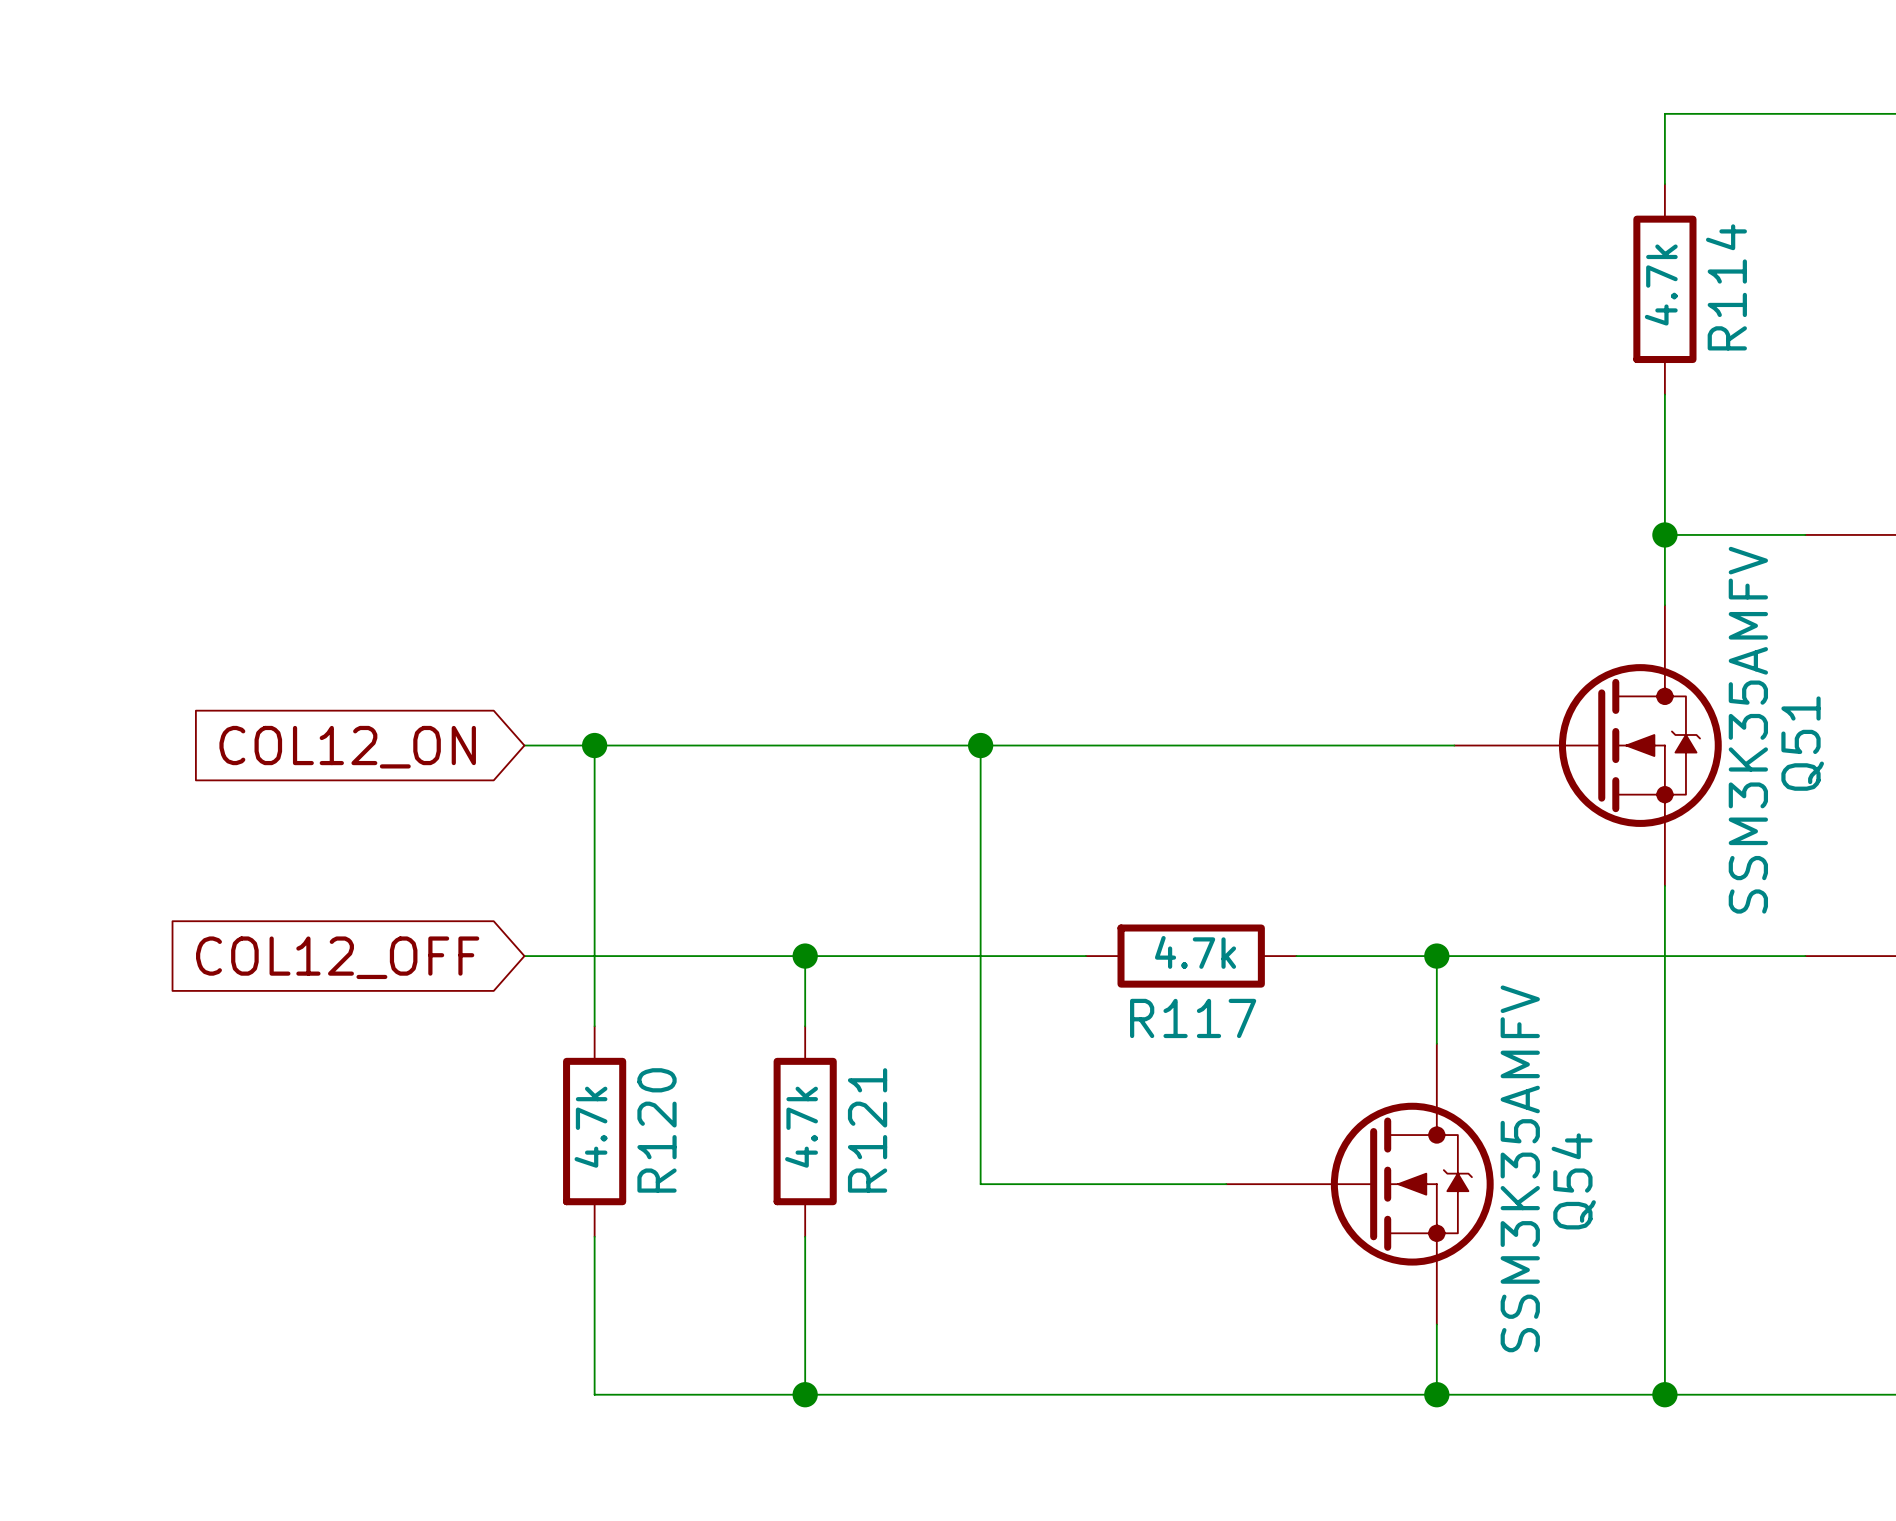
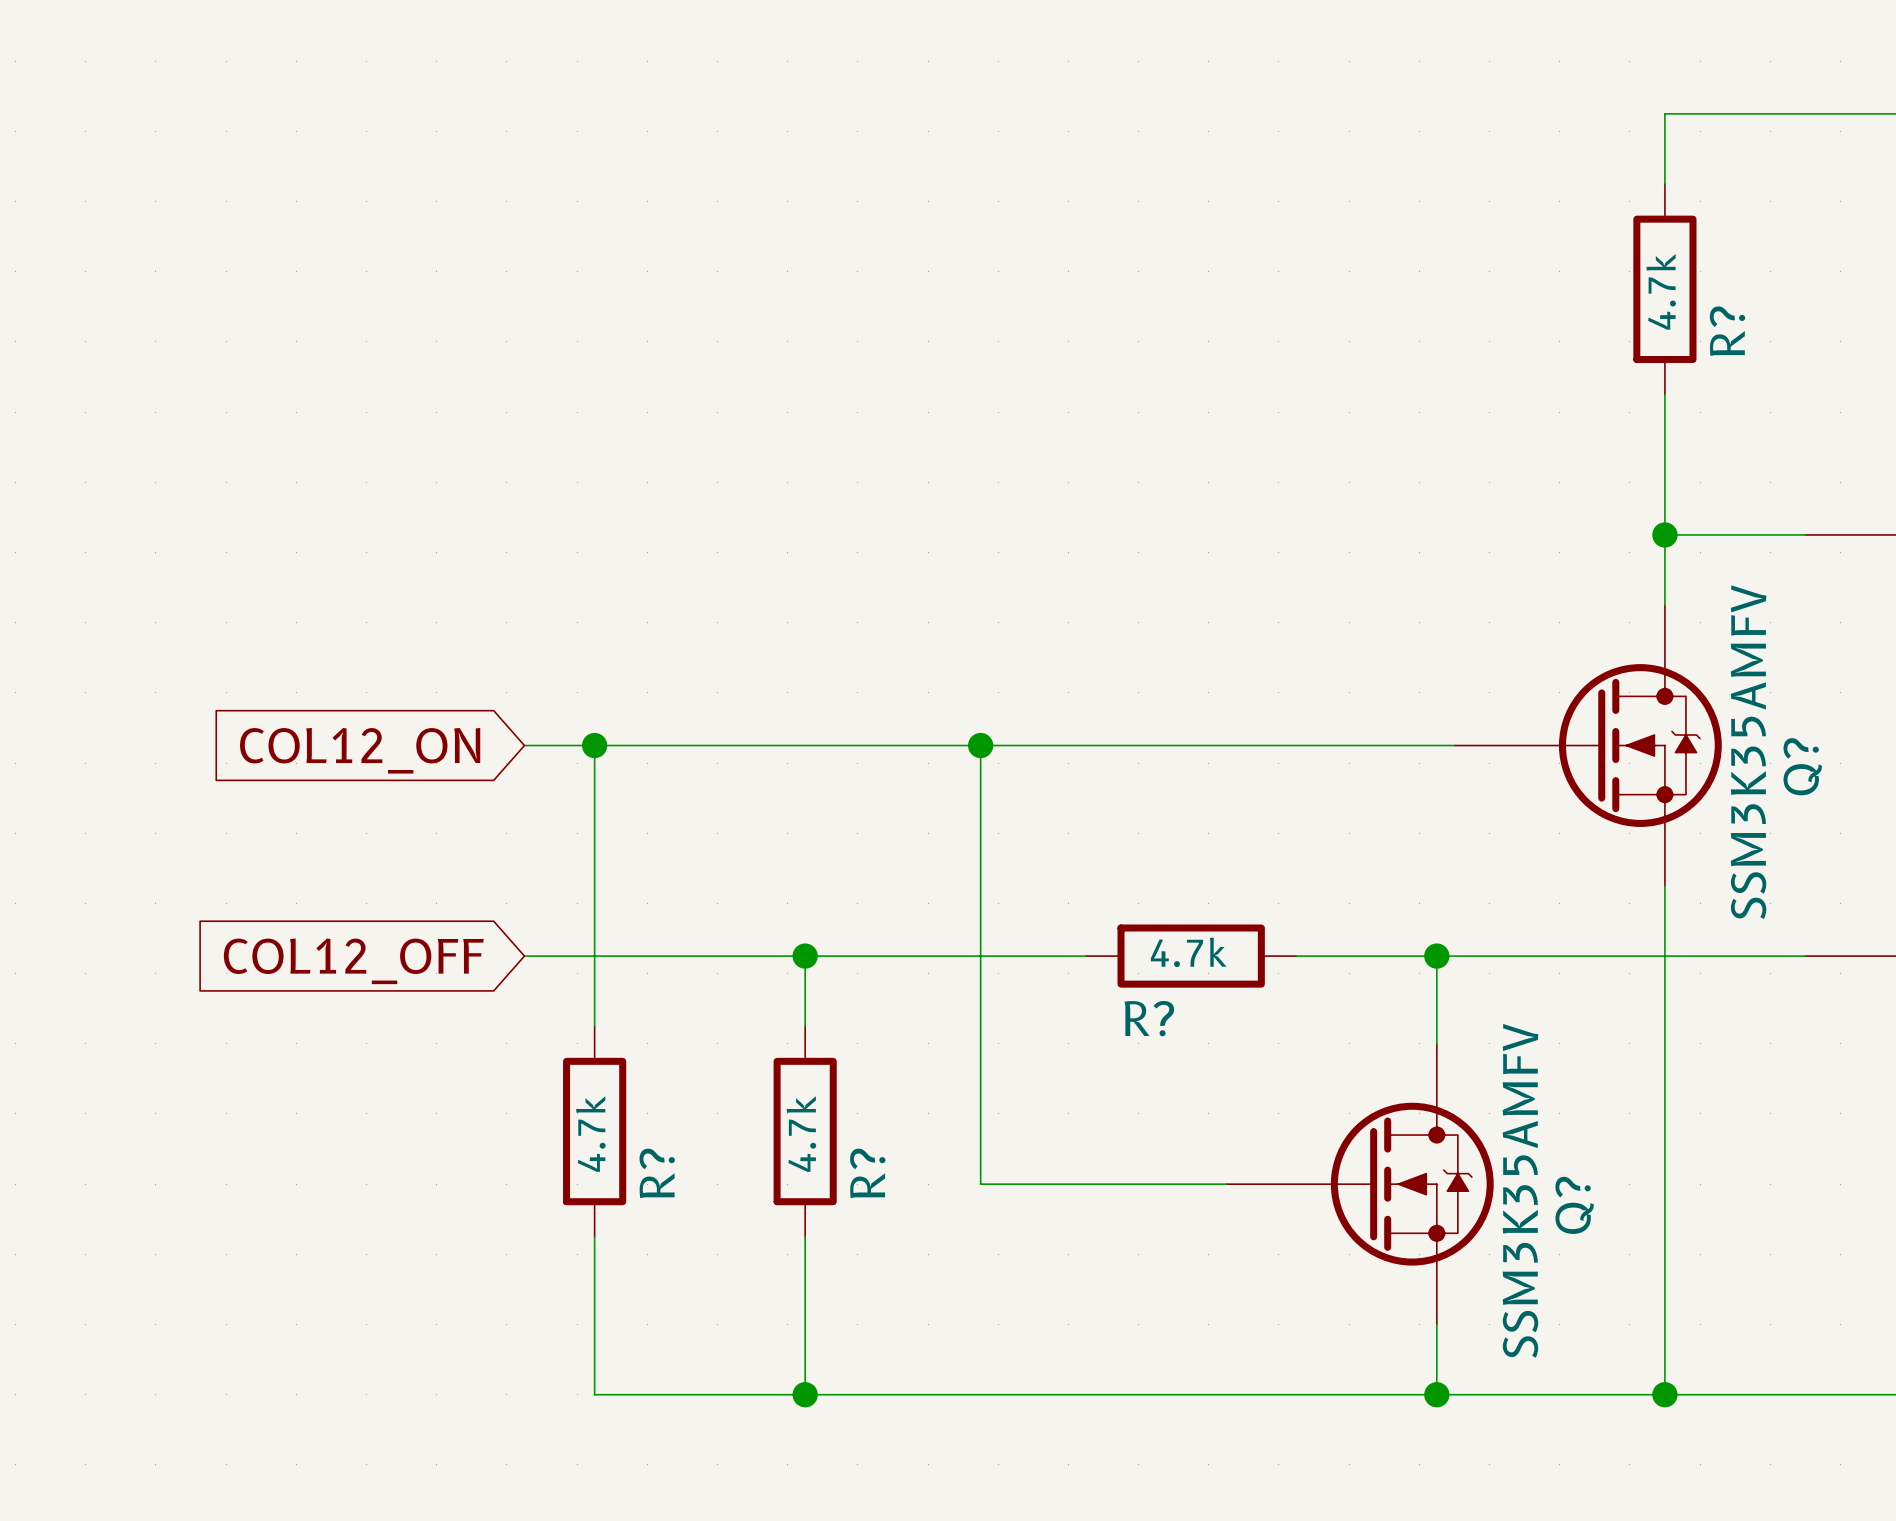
R114 name: R114 (1726, 287) -> R? (1727, 331)
Q51 name: Q51 (1802, 743) -> Q? (1802, 766)
R117 name: R117 (1193, 1018) -> R? (1149, 1018)
R120 name: R120 (657, 1130) -> R? (657, 1173)
R121 name: R121 (867, 1130) -> R? (867, 1173)
Q54 name: Q54 (1573, 1181) -> Q? (1574, 1205)

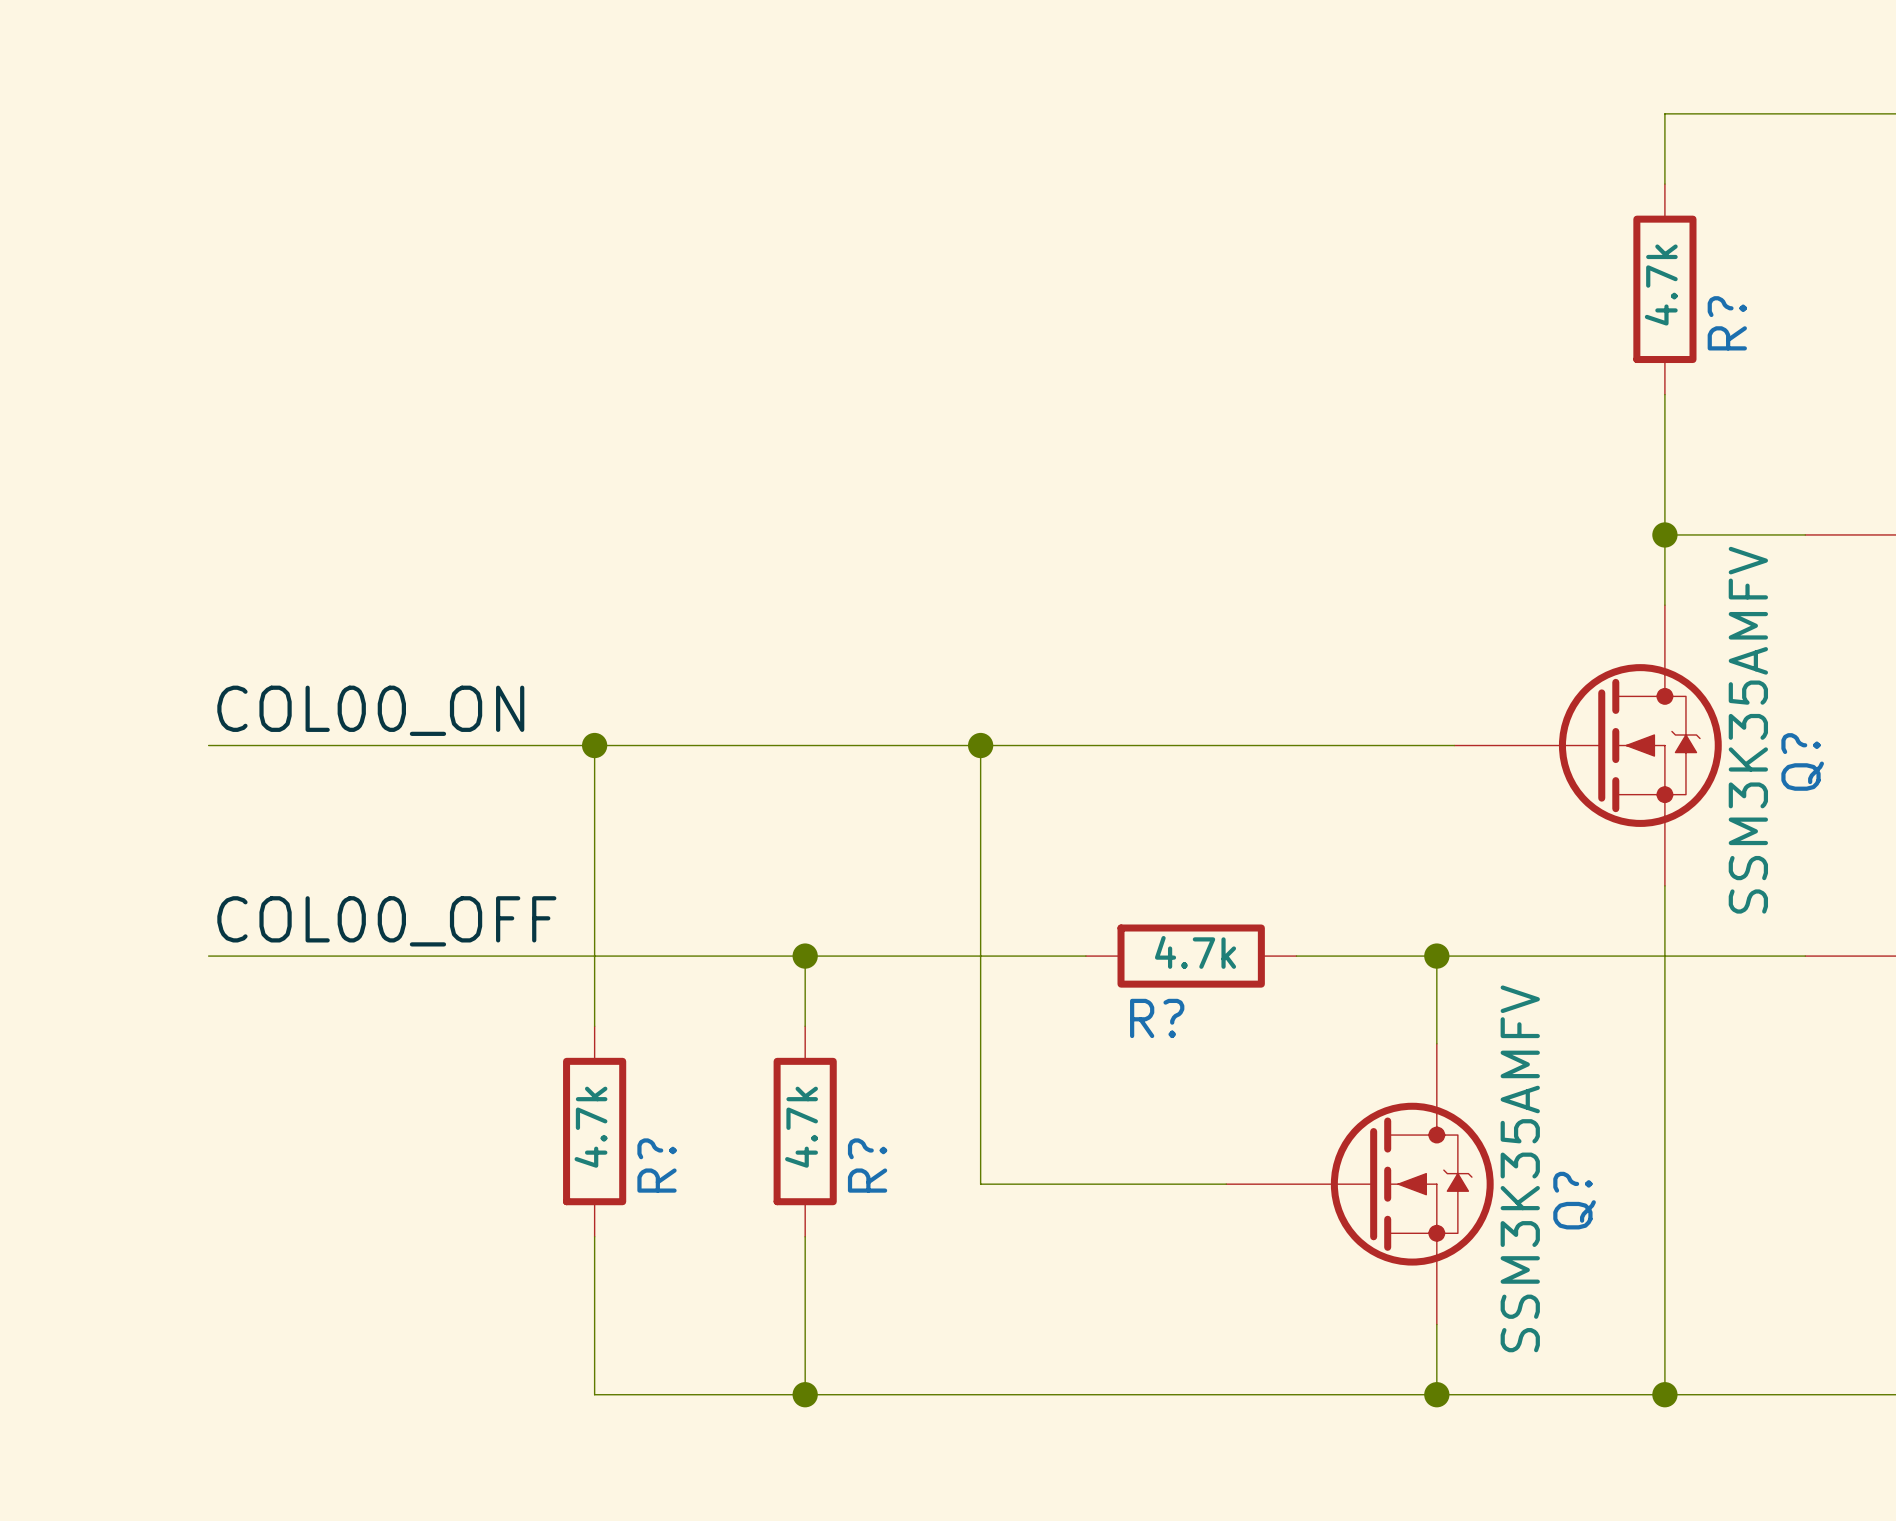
label: none -> COL00_ON (370, 710)
wire: none -> (208, 745) (524, 745)
global label: COL12_ON (360, 750) -> none
label: none -> COL00_OFF (386, 921)
wire: none -> (208, 956) (524, 956)
global label: COL12_OFF (353, 961) -> none

